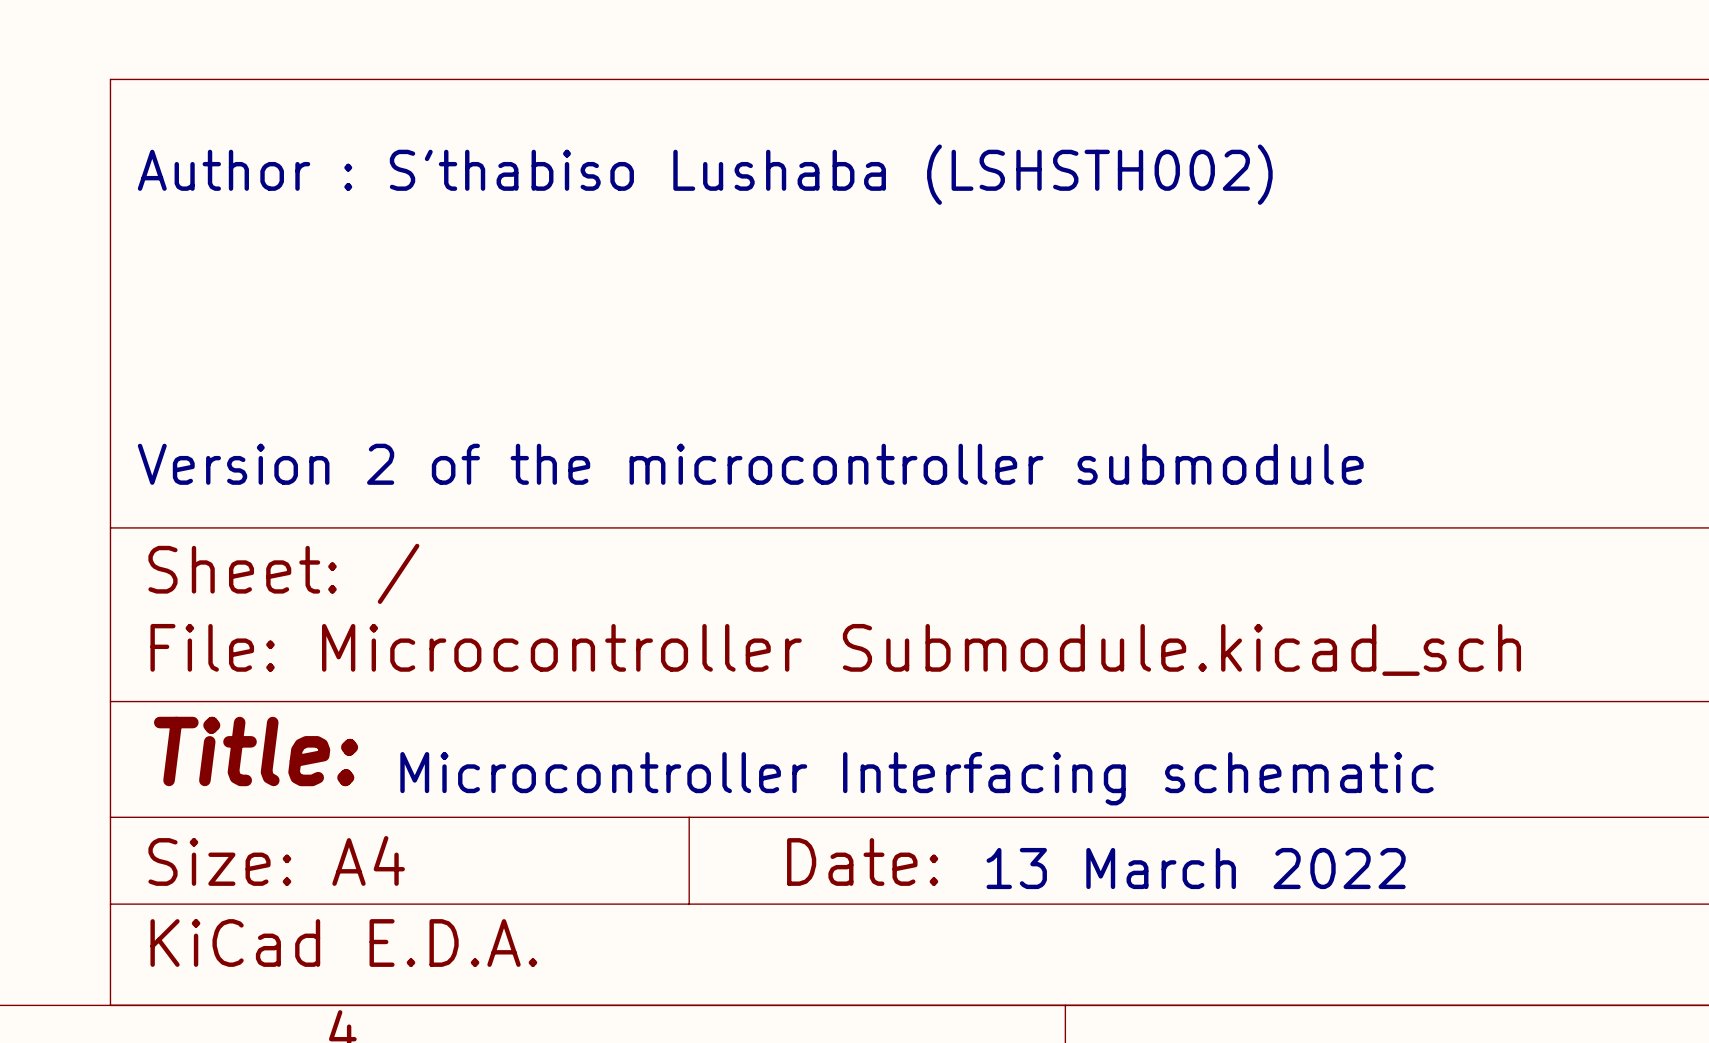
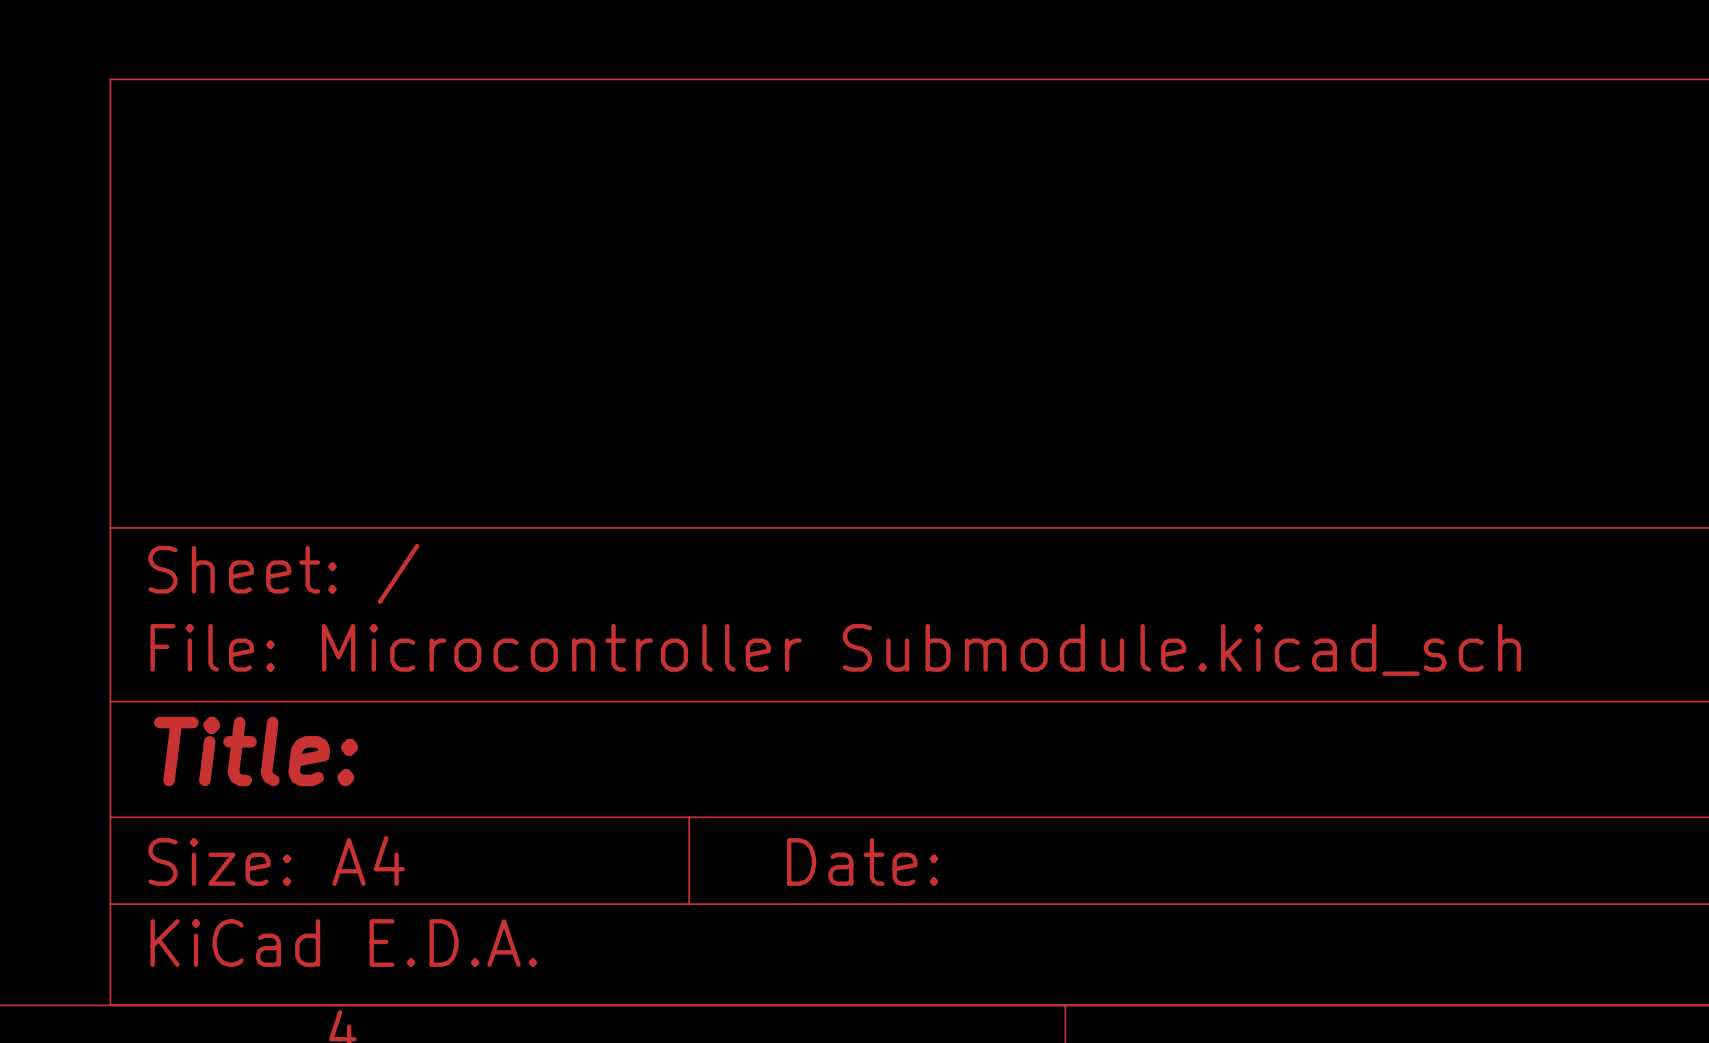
text: Author : S'thabiso Lushaba (LSHSTH002) (705, 174) -> none
text: Version 2 of the microcontroller submodule (750, 464) -> none
text: Microcontroller Interfacing schematic (917, 778) -> none
text: 13 March 2022 (1196, 868) -> none

